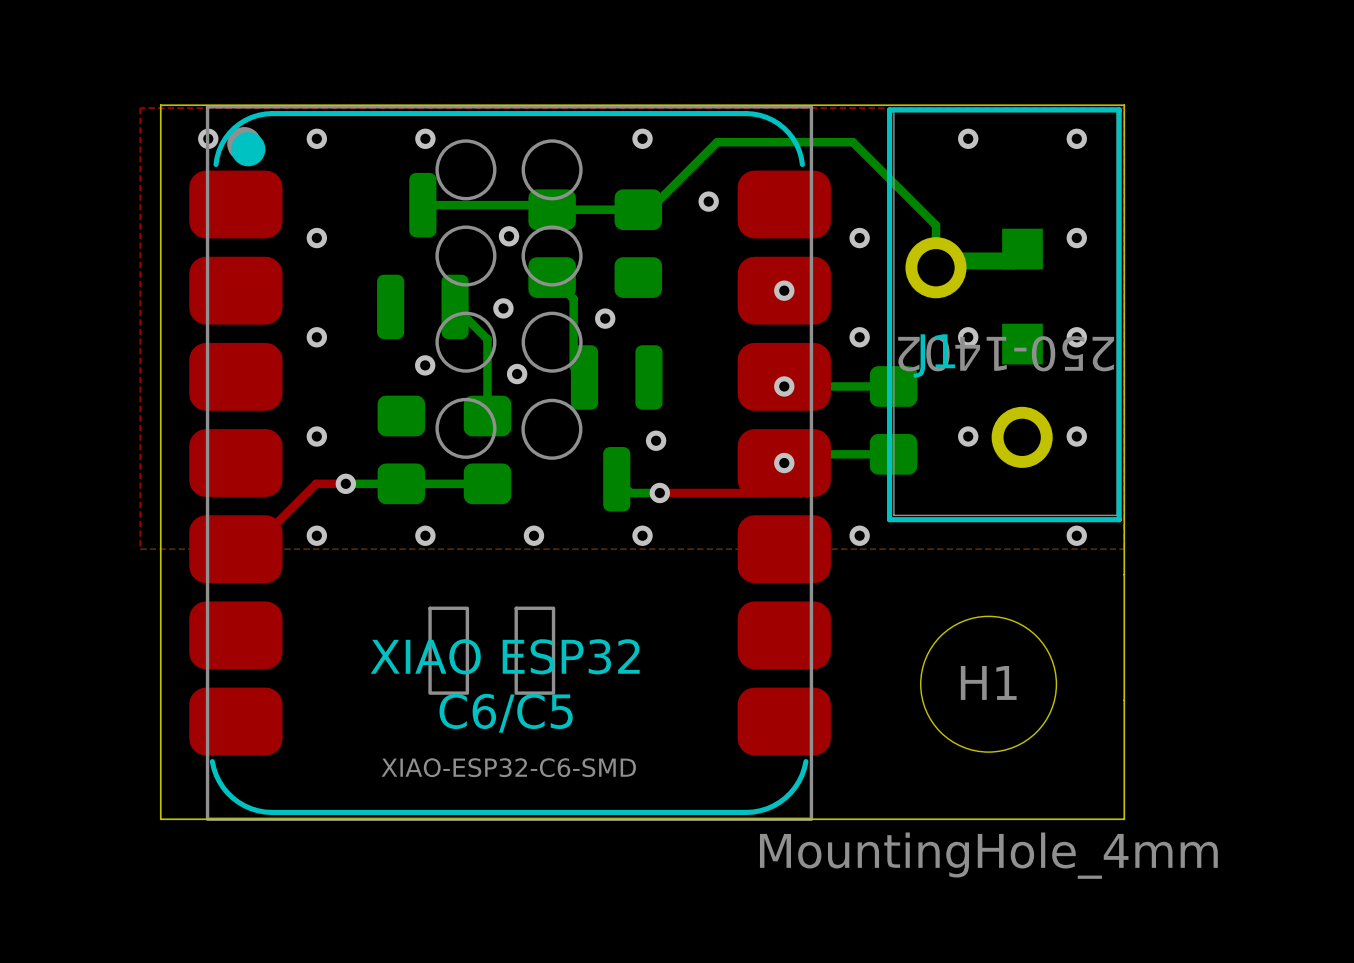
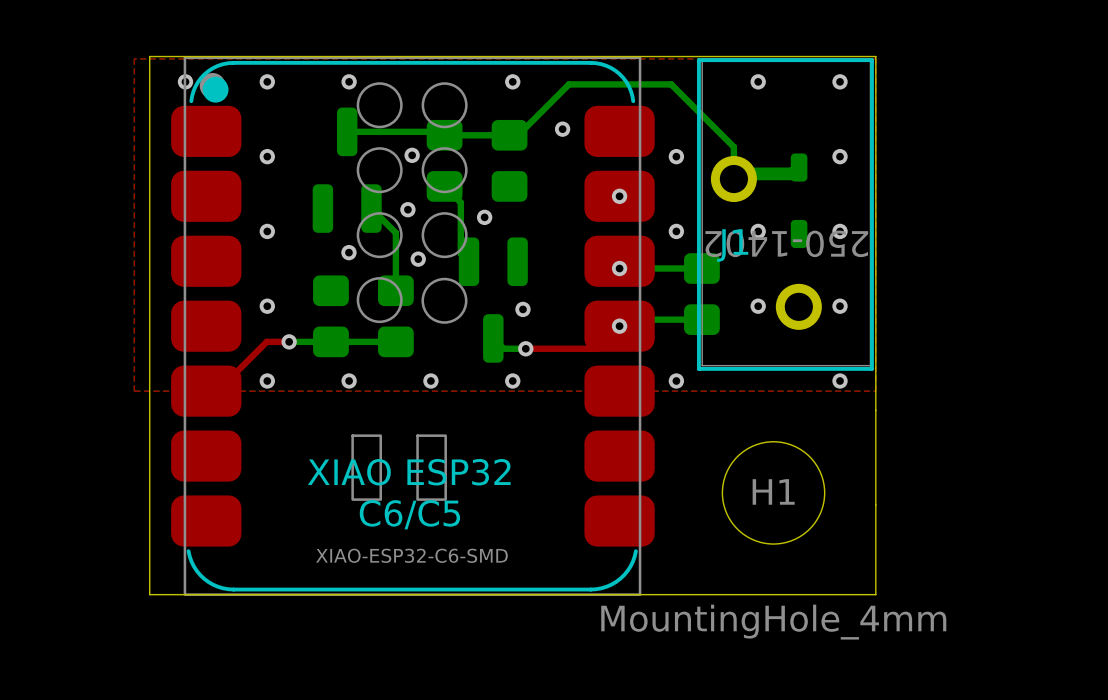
part footprint: [1002, 228, 1043, 365] -> [790, 153, 808, 249]

